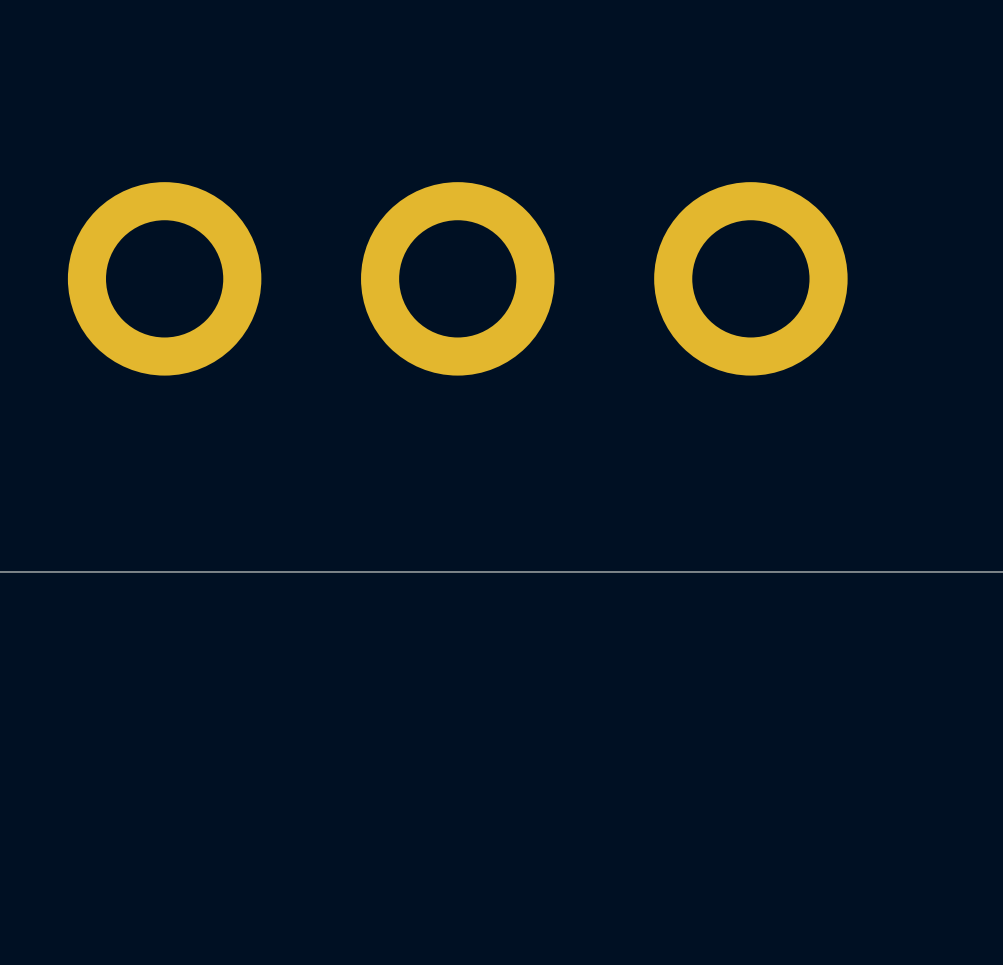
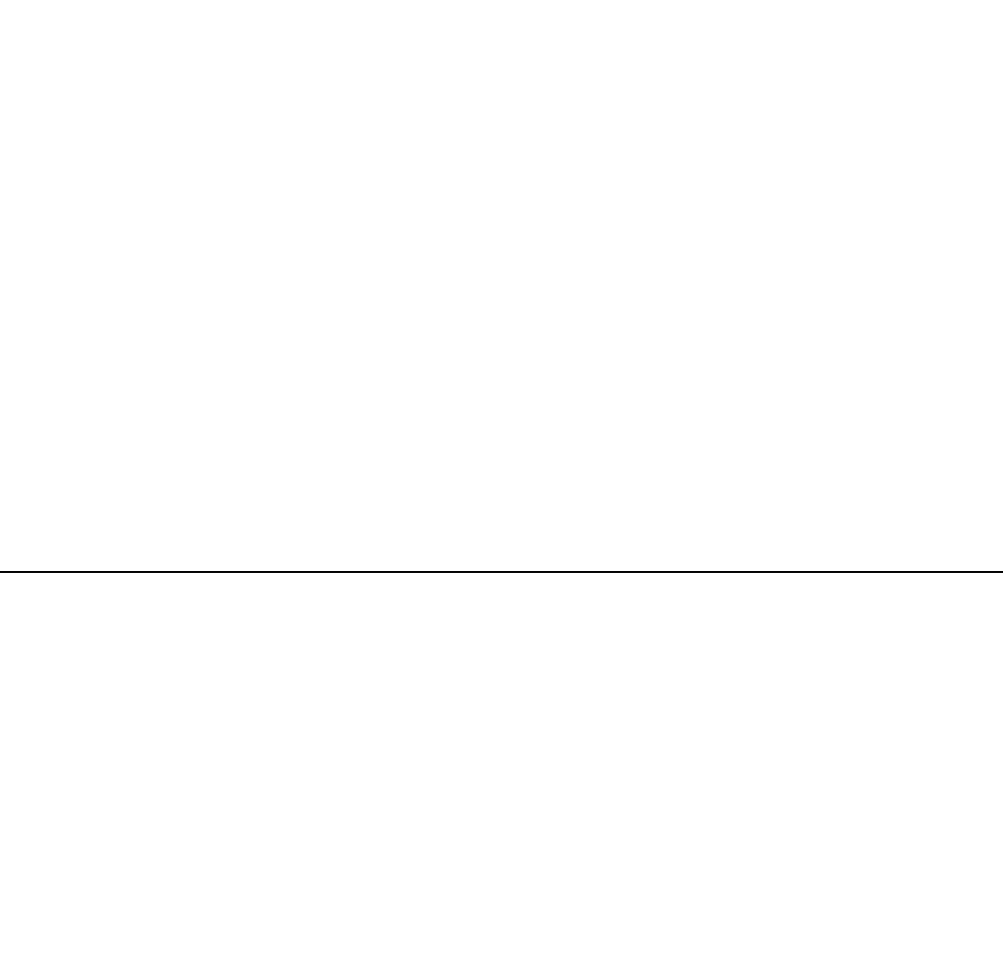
part: (457, 278) -> none

